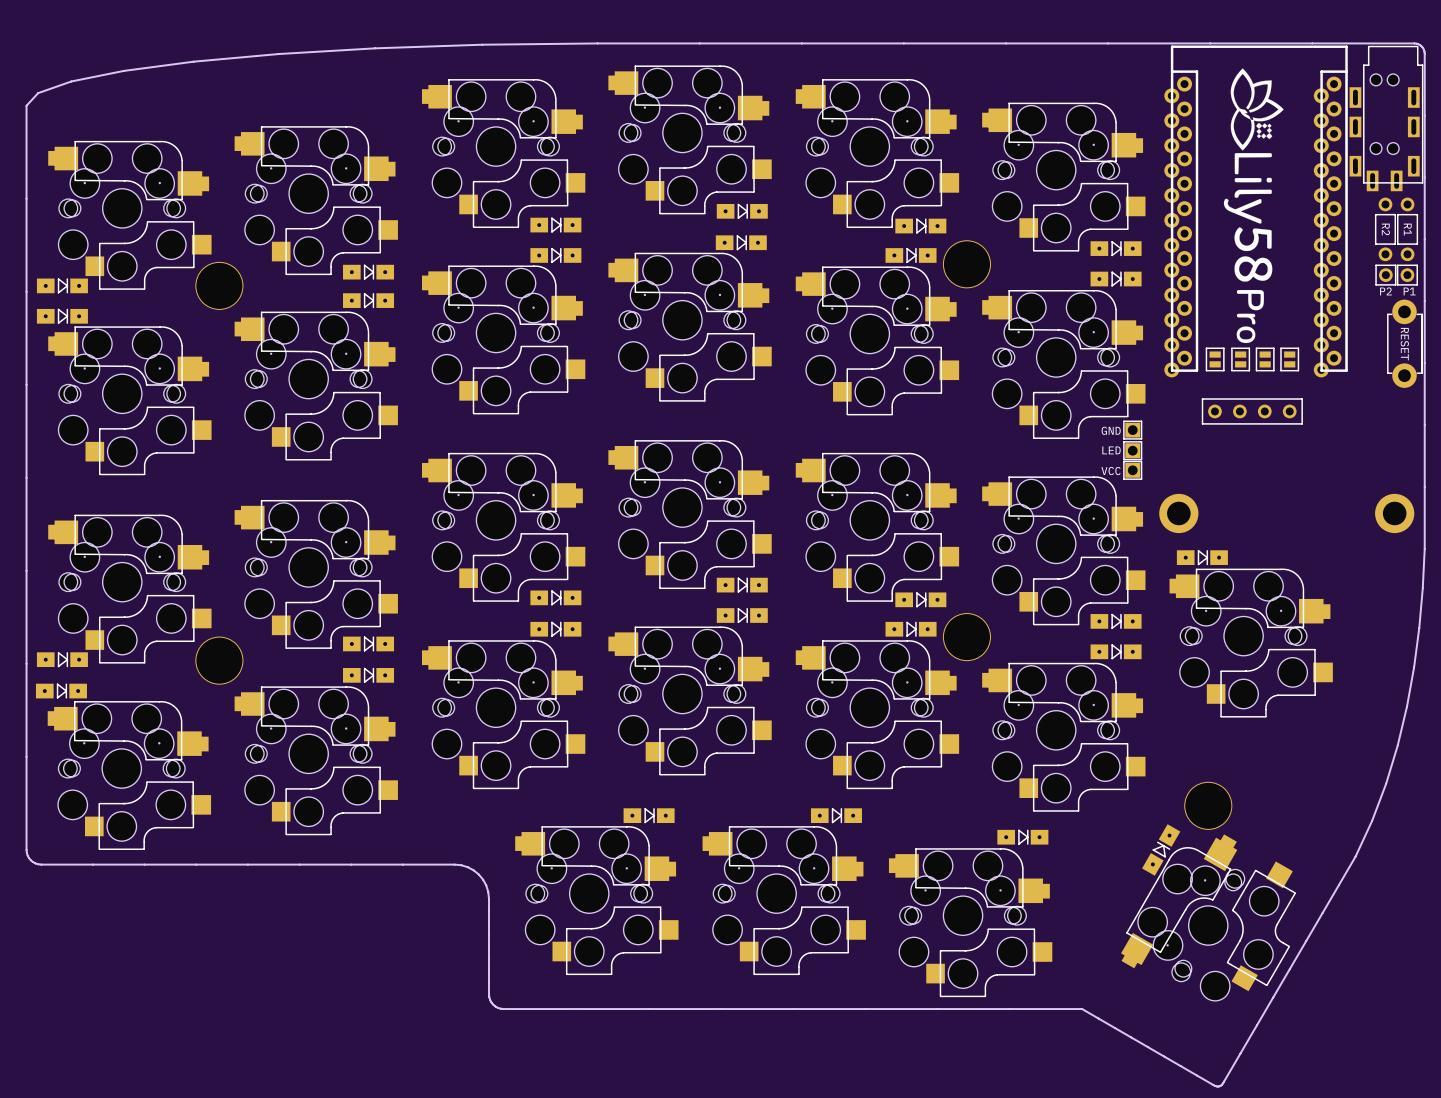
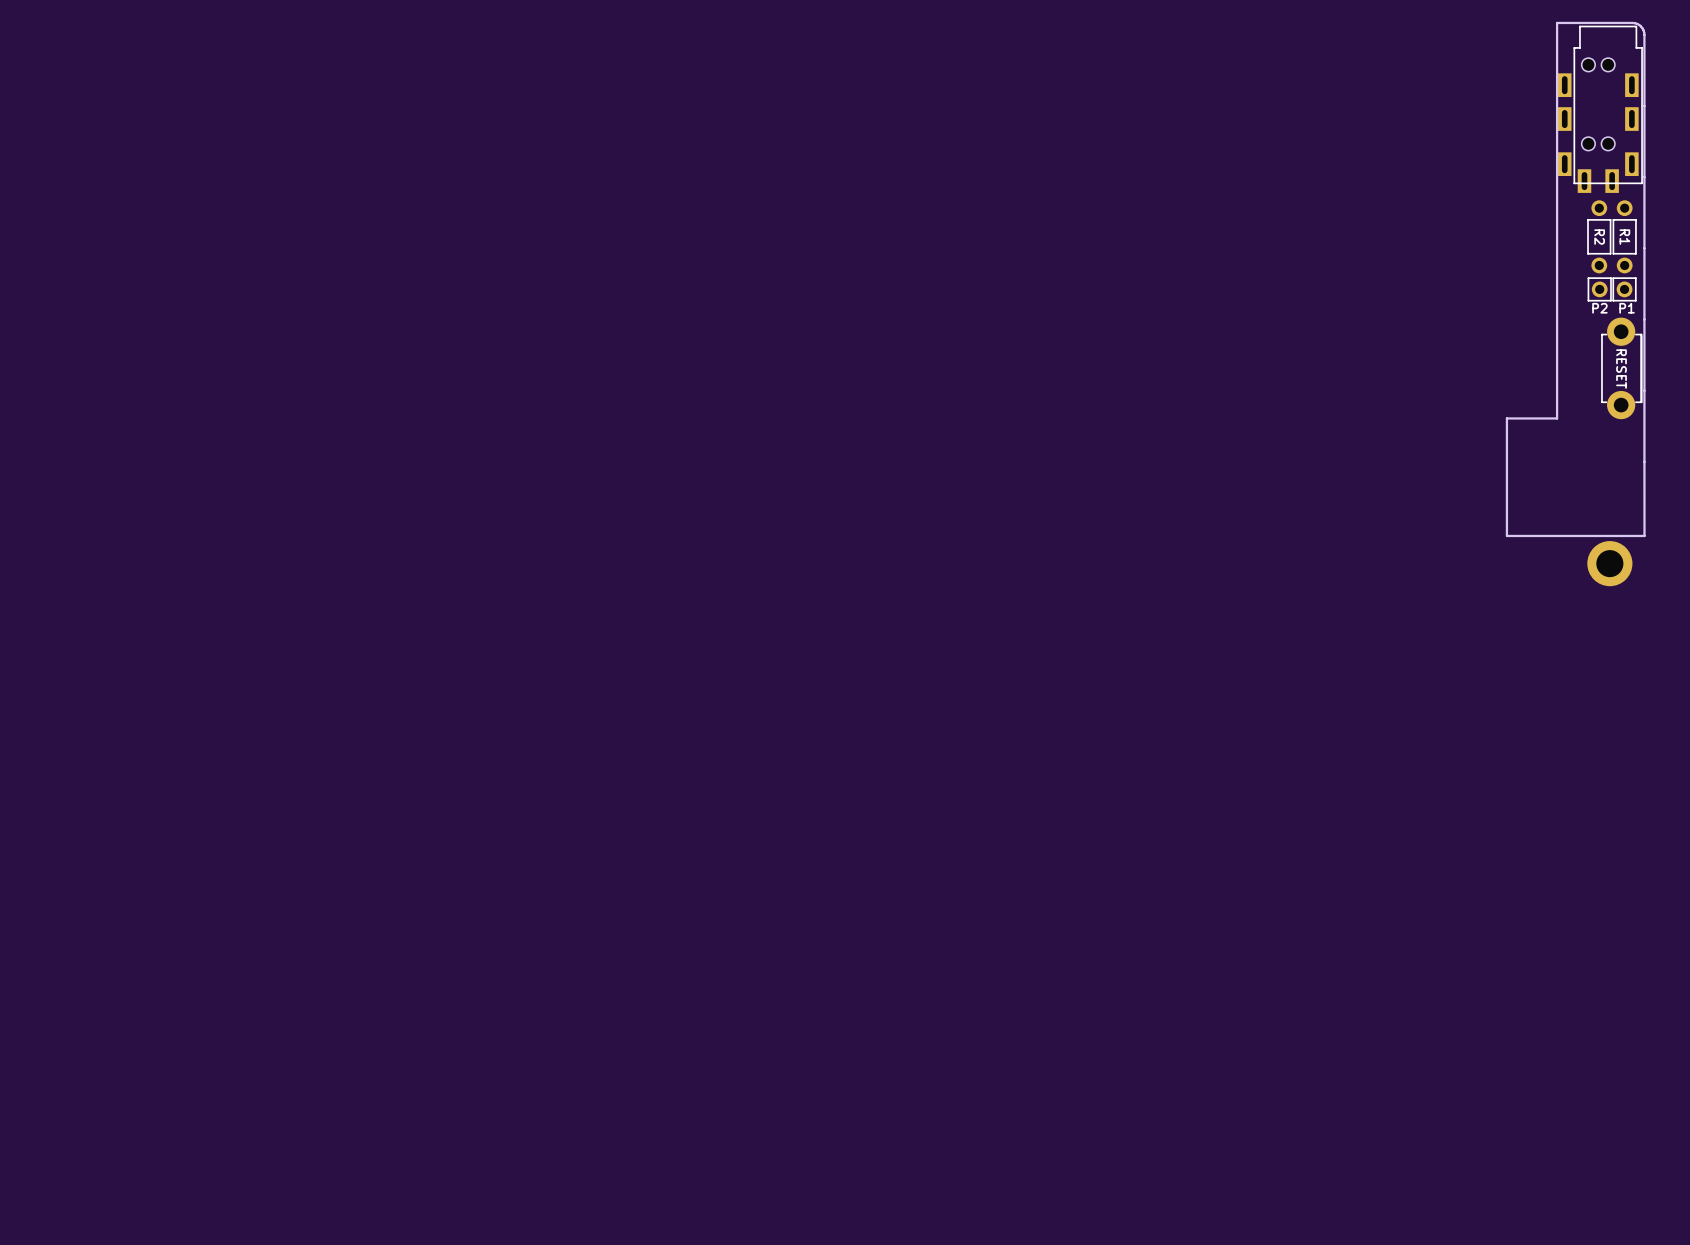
board edge: (1348, 43) (597, 43) (375, 48) (278, 54) (193, 61) (123, 70) (71, 81) (38, 93) (26, 105) (26, 852) (33, 862) (41, 864) (461, 865) (478, 874) (488, 892) (489, 997) (493, 1004) (500, 1008) (1082, 1009) (1213, 1085) (1219, 1086) (1355, 856) (1386, 783) (1406, 706) (1419, 627) (1424, 548) (1424, 424) -> (1557, 22) (1557, 418) (1506, 418) (1506, 535) (1644, 535) (1644, 461)
drawing: [1223, 68, 1284, 344] -> none
part: (690, 139) -> none
part: (503, 153) -> none
part: (877, 153) -> none
part: (1063, 177) -> none
part: (316, 200) -> none
part: (742, 211) -> none
part: (1256, 211) -> none
part: (129, 215) -> none
part: (555, 225) -> none
part: (920, 226) -> none
part: (741, 242) -> none
part: (1116, 248) -> none
part: (555, 255) -> none
part: (911, 255) -> none
part: (966, 264) -> none
part: (368, 272) -> none
part: (1116, 279) -> none
part: (62, 285) -> none
part: (219, 285) -> none
part: (368, 300) -> none
part: (62, 316) -> none
part: (690, 327) -> none
part: (503, 339) -> none
part: (877, 340) -> none
part: (1215, 359) -> none
part: (1240, 359) -> none
part: (1265, 359) -> none
part: (1289, 359) -> none
part: (1063, 364) -> none
part: (316, 386) -> none
part: (129, 400) -> none
part: (1252, 411) -> none
part: (1132, 450) -> none
part: (1178, 513) -> none
part: (690, 514) -> none
part: (503, 527) -> none
part: (877, 527) -> none
part: (1063, 550) -> none
part: (1202, 557) -> none
part: (316, 574) -> none
part: (742, 585) -> none
part: (129, 589) -> none
part: (555, 597) -> none
part: (920, 599) -> none
part: (742, 615) -> none
part: (1116, 621) -> none
part: (555, 629) -> none
part: (911, 629) -> none
part: (966, 637) -> none
part: (368, 643) -> none
part: (1251, 643) -> none
part: (1116, 651) -> none
part: (62, 659) -> none
part: (219, 660) -> none
part: (368, 675) -> none
part: (61, 691) -> none
part: (690, 700) -> none
part: (503, 714) -> none
part: (877, 714) -> none
part: (1063, 737) -> none
part: (316, 760) -> none
part: (129, 775) -> none
part: (1208, 805) -> none
part: (649, 815) -> none
part: (836, 815) -> none
part: (1022, 837) -> none
part: (1161, 849) -> none
part: (596, 900) -> none
part: (784, 900) -> none
part: (1208, 917) -> none
part: (970, 922) -> none

